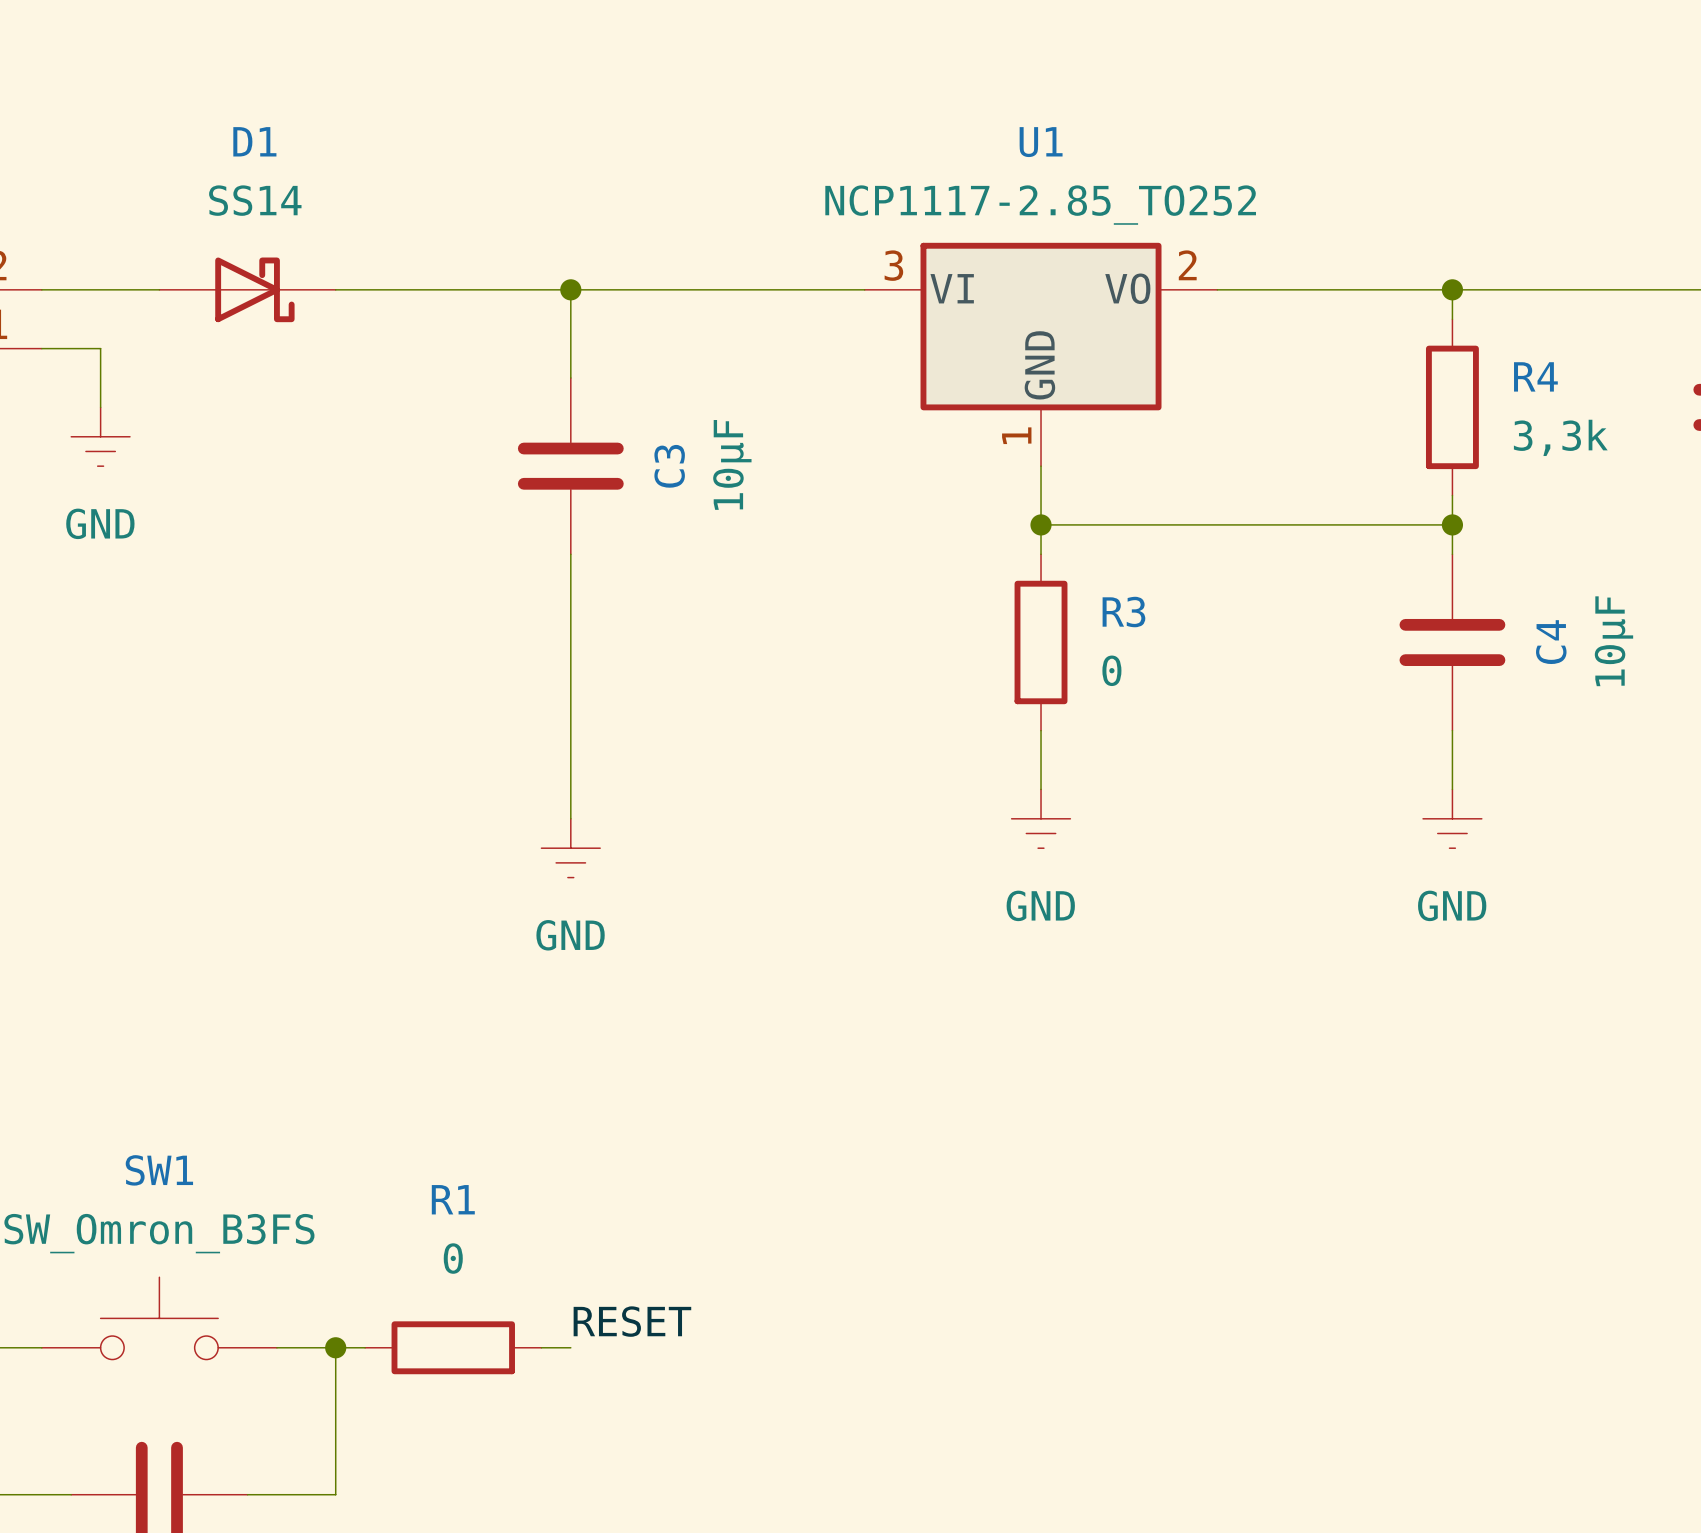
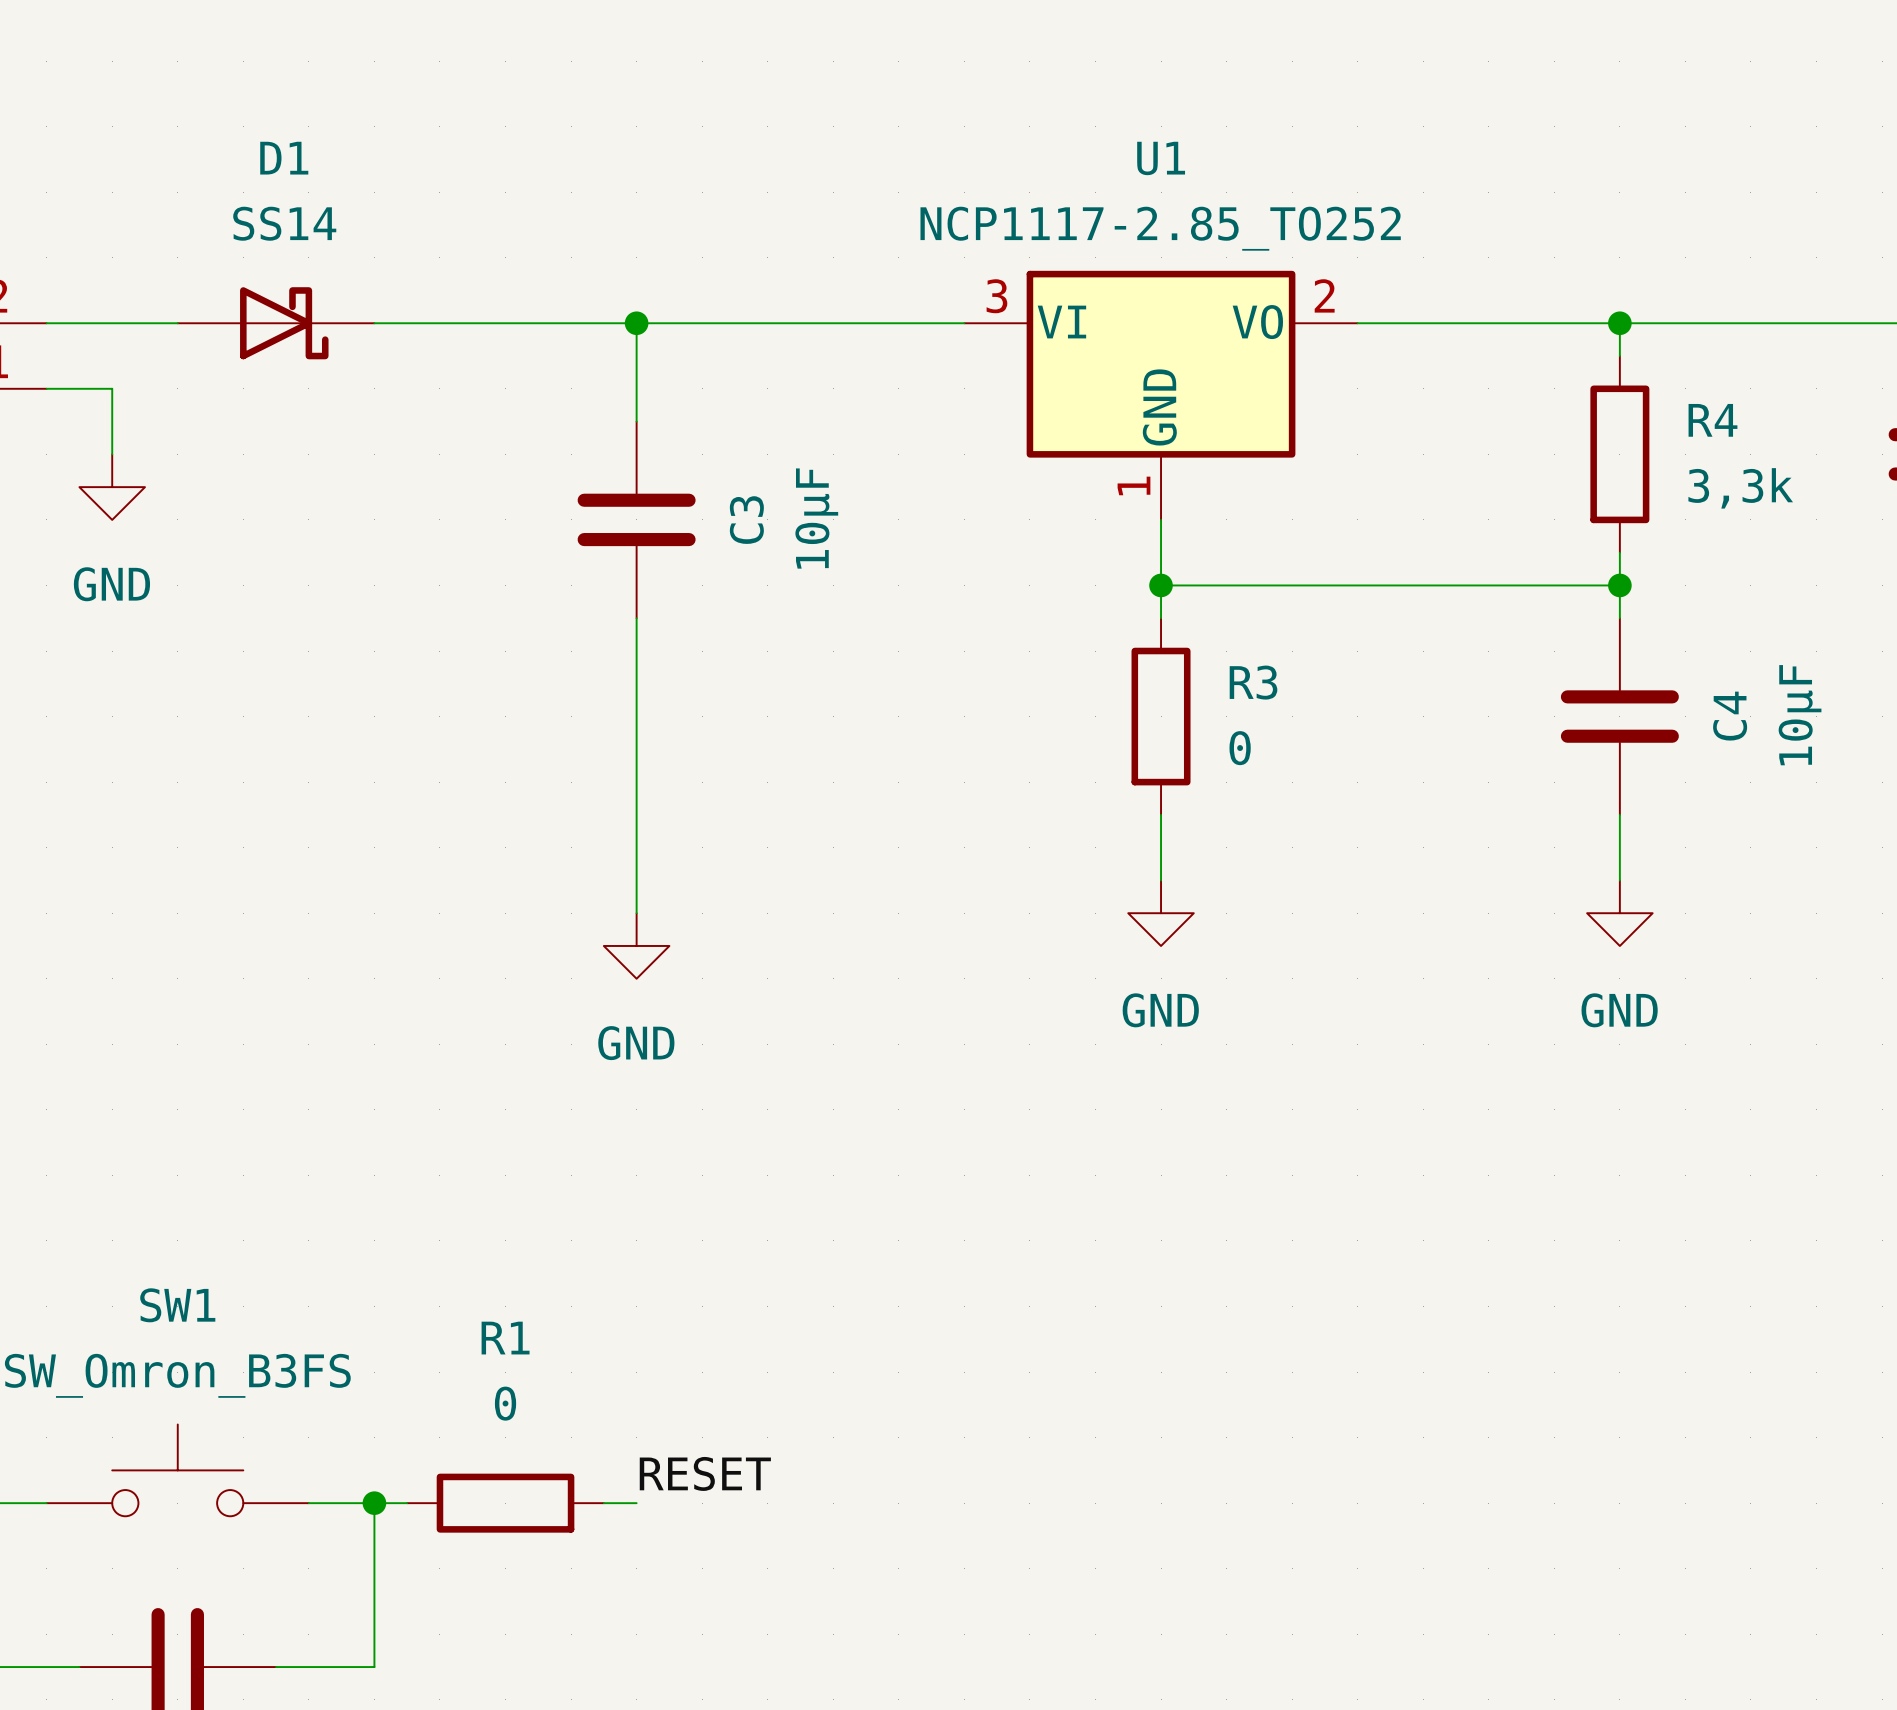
power symbol shape: [71, 407, 131, 467] -> [79, 454, 145, 520]
power symbol shape: [1011, 789, 1071, 849] -> [1128, 880, 1194, 946]
power symbol shape: [1423, 789, 1482, 849] -> [1587, 880, 1653, 946]
power symbol shape: [541, 818, 601, 878] -> [603, 913, 670, 979]

